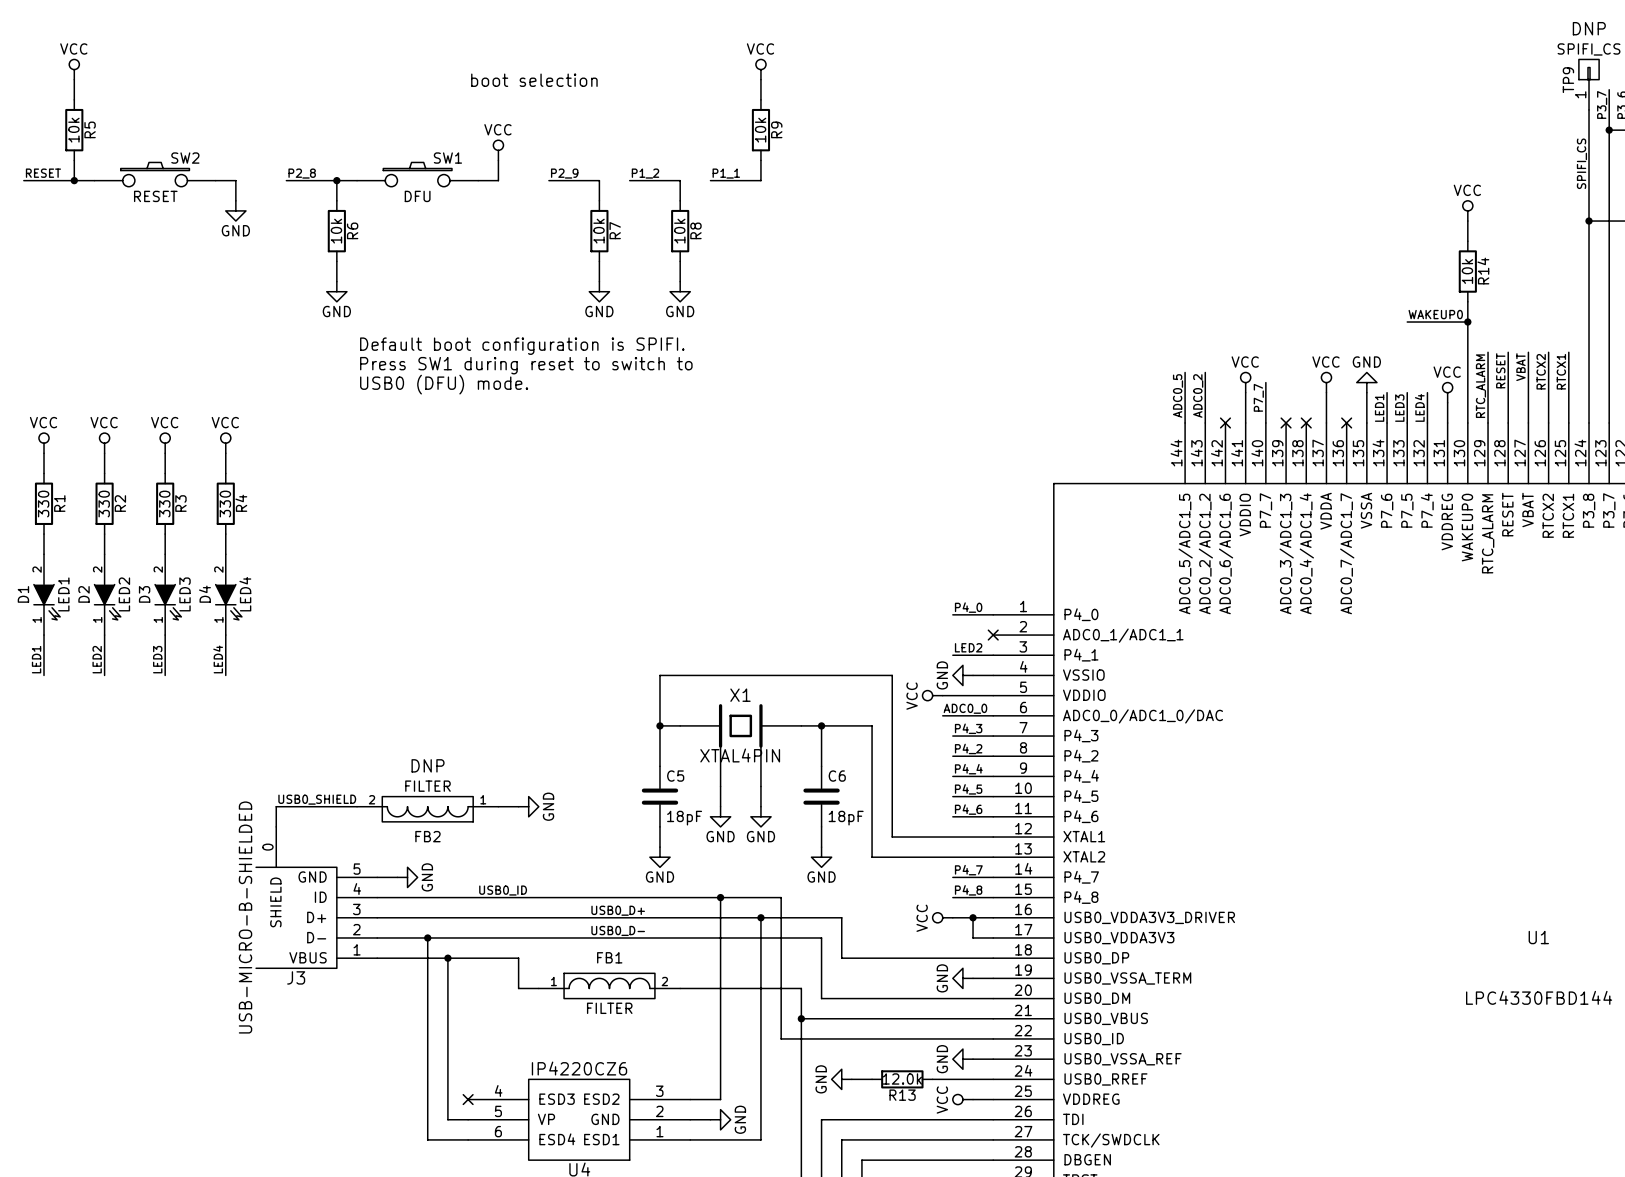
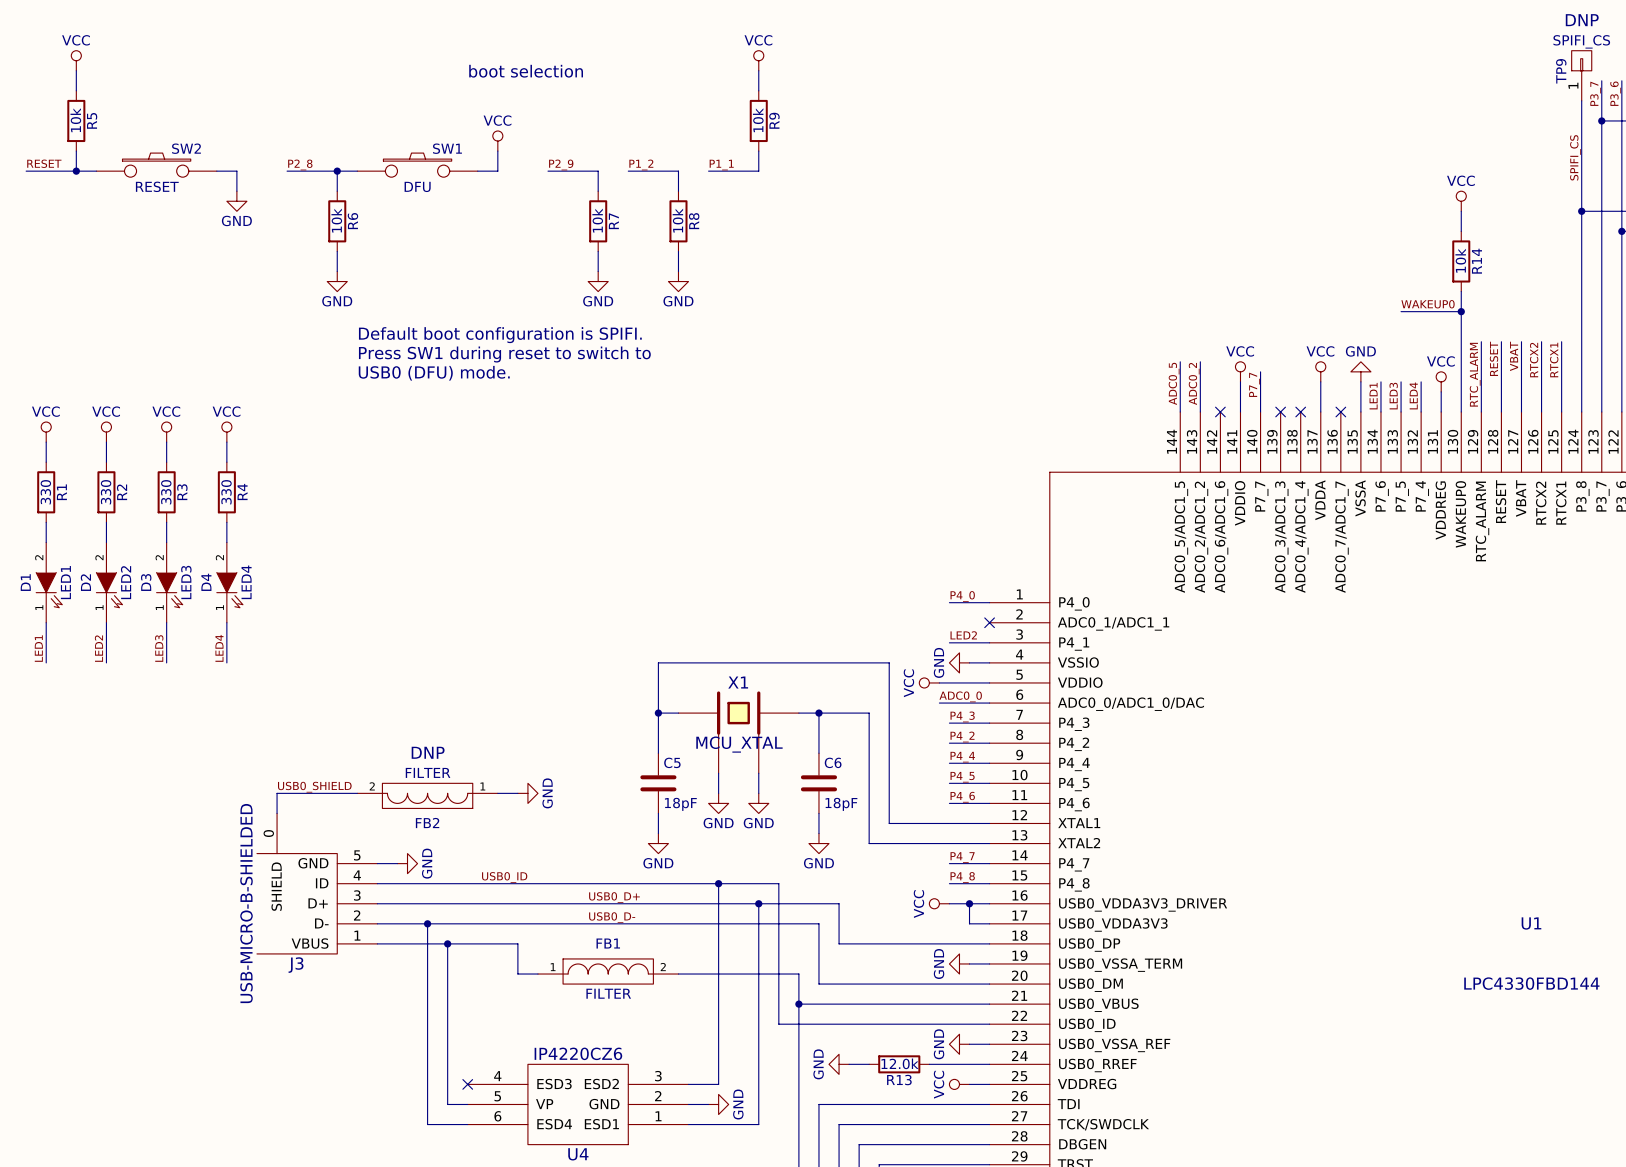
X1 value: XTAL4PIN (740, 755) -> MCU_XTAL (739, 744)

